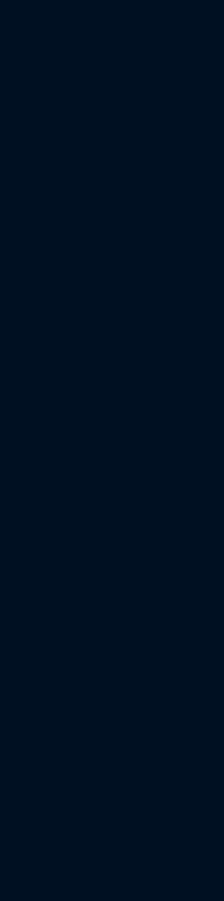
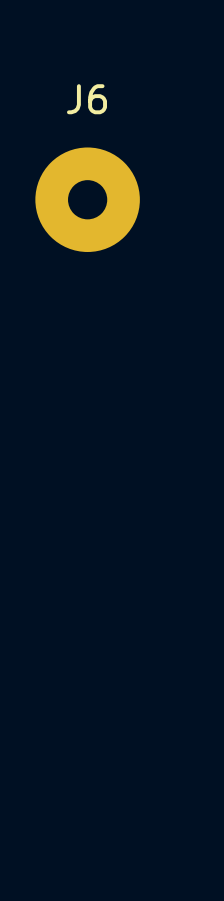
J6: none -> (87, 199)

